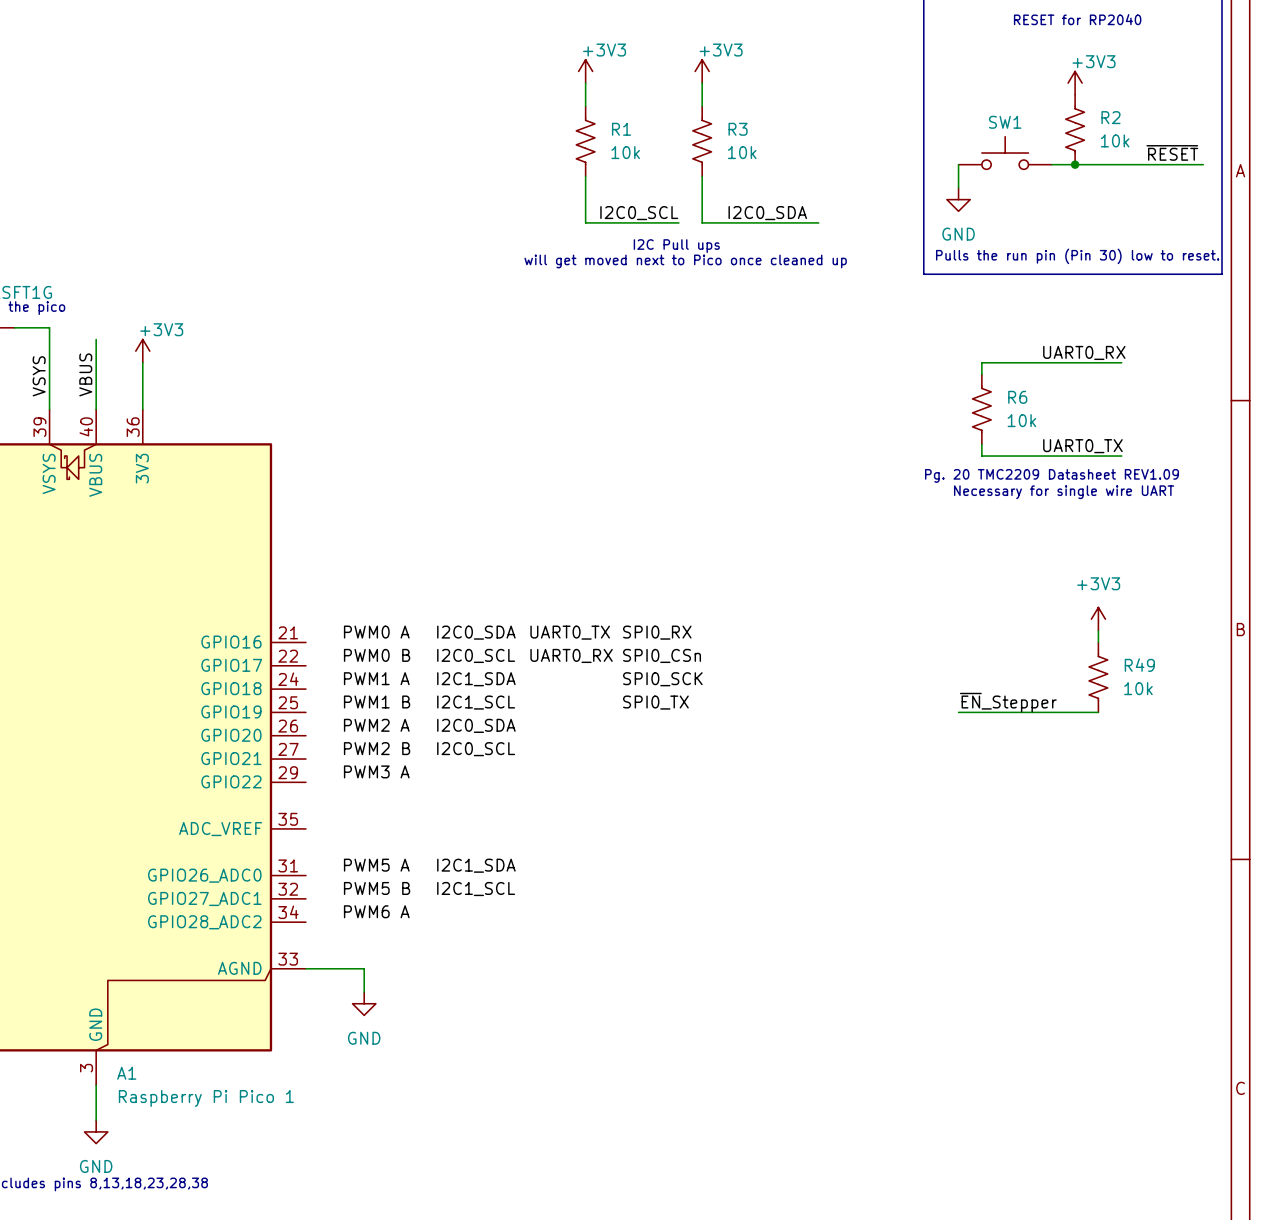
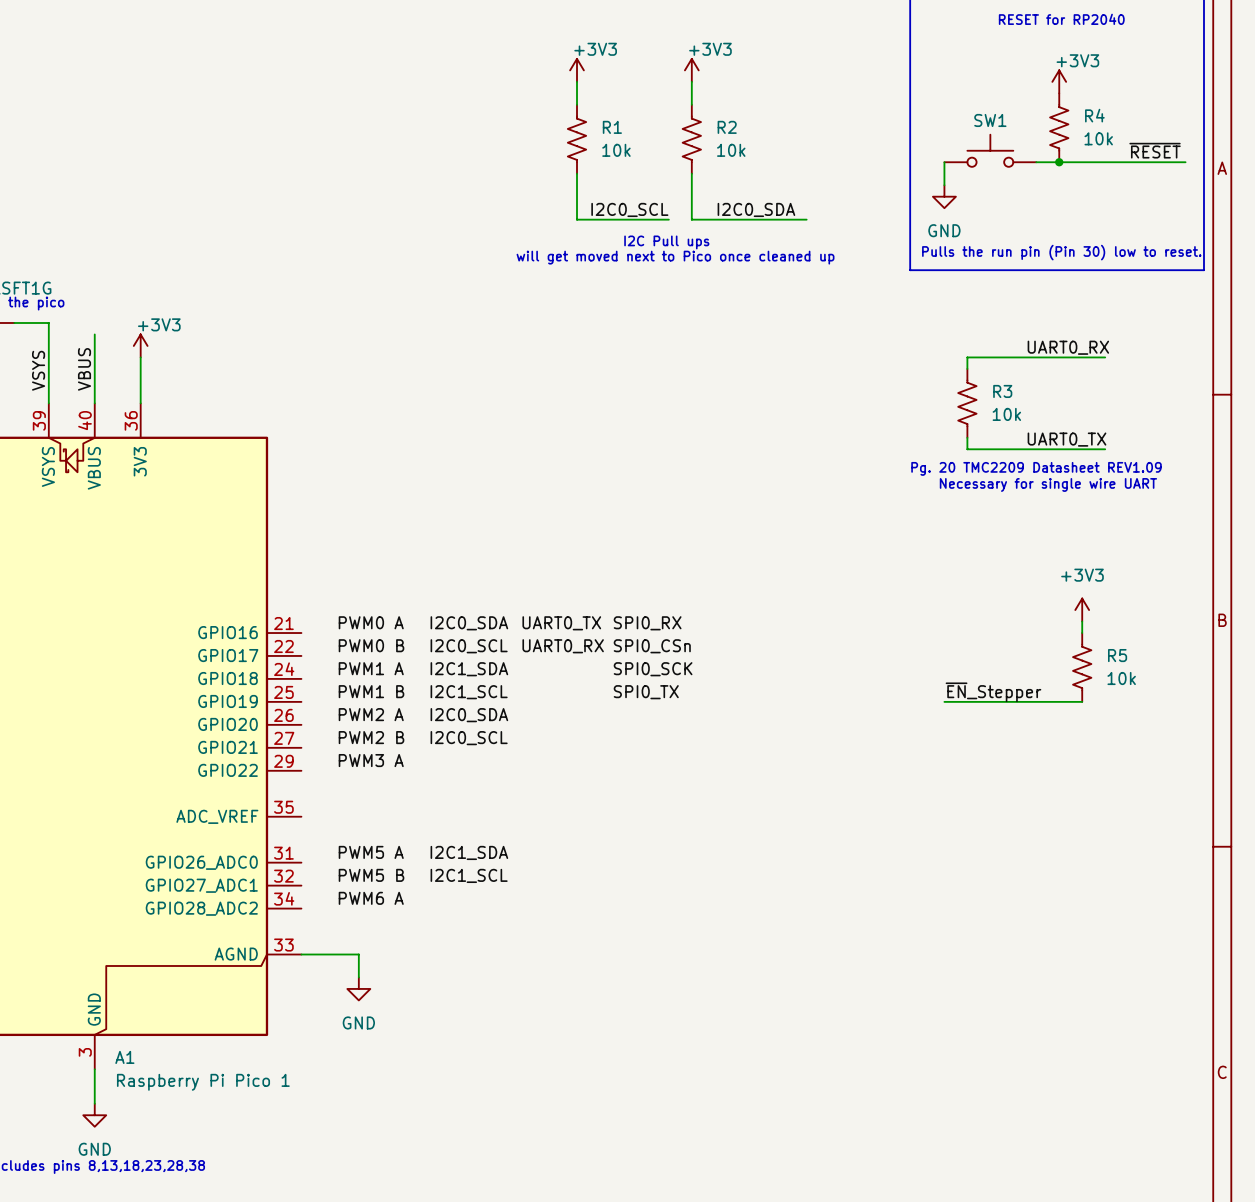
R2 name: R2 (1110, 117) -> R4 (1094, 115)
R3 name: R3 (738, 129) -> R2 (727, 127)
R6 name: R6 (1017, 397) -> R3 (1002, 391)
R49 name: R49 (1139, 665) -> R5 (1117, 655)

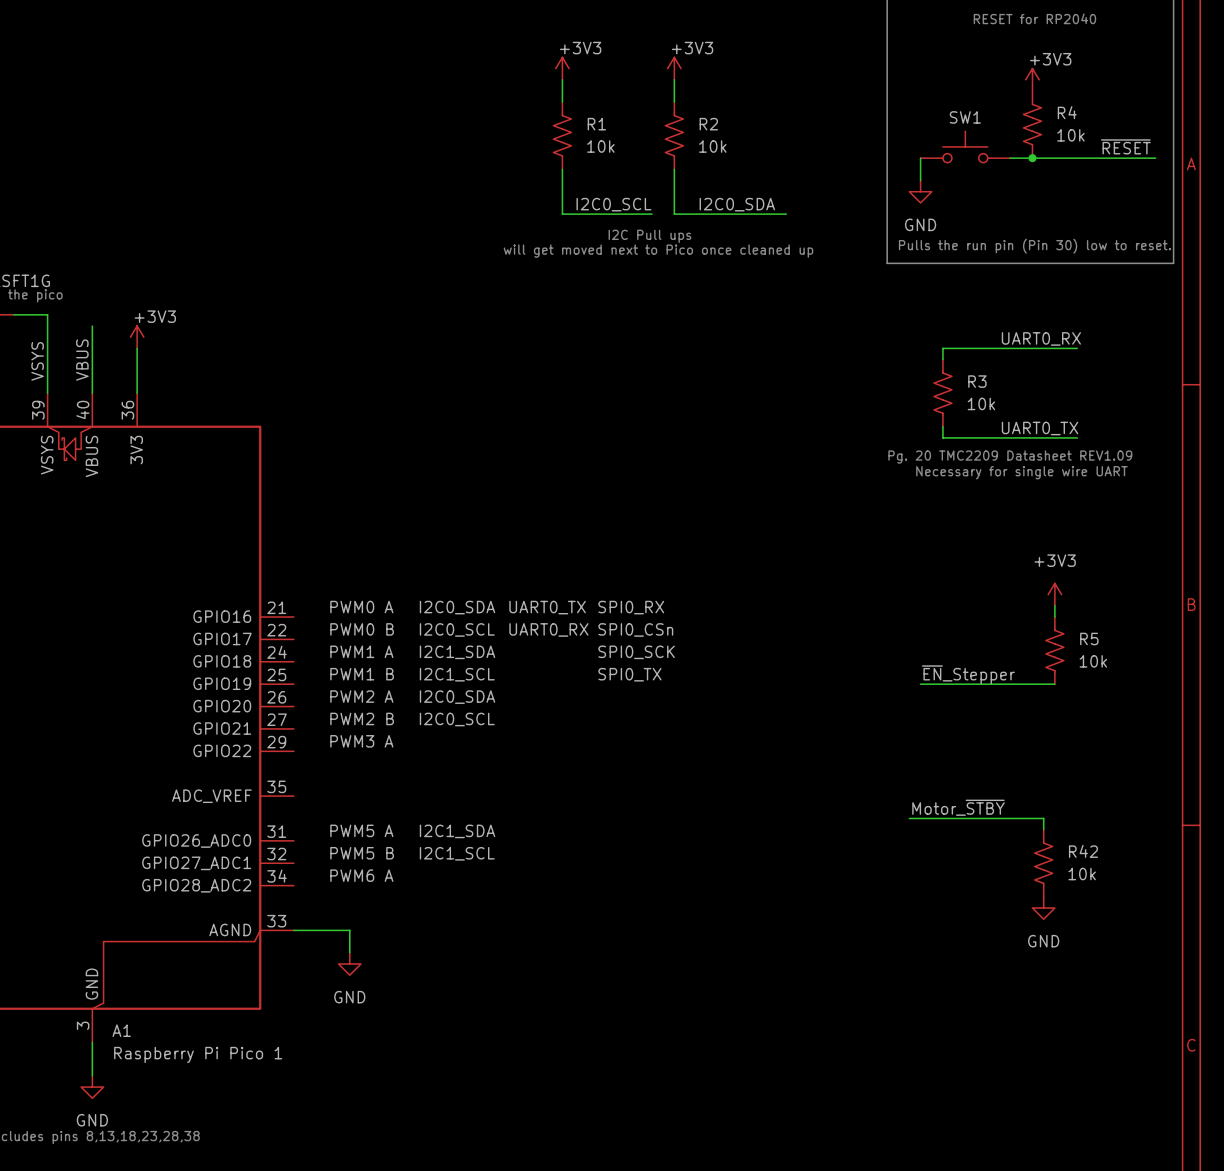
label: none -> Motor_~{STBY} (958, 807)
wire: none -> (909, 818) (1043, 818) (1043, 829)
R42: none -> 10k (1043, 863)
power symbol: none -> GND (1043, 908)

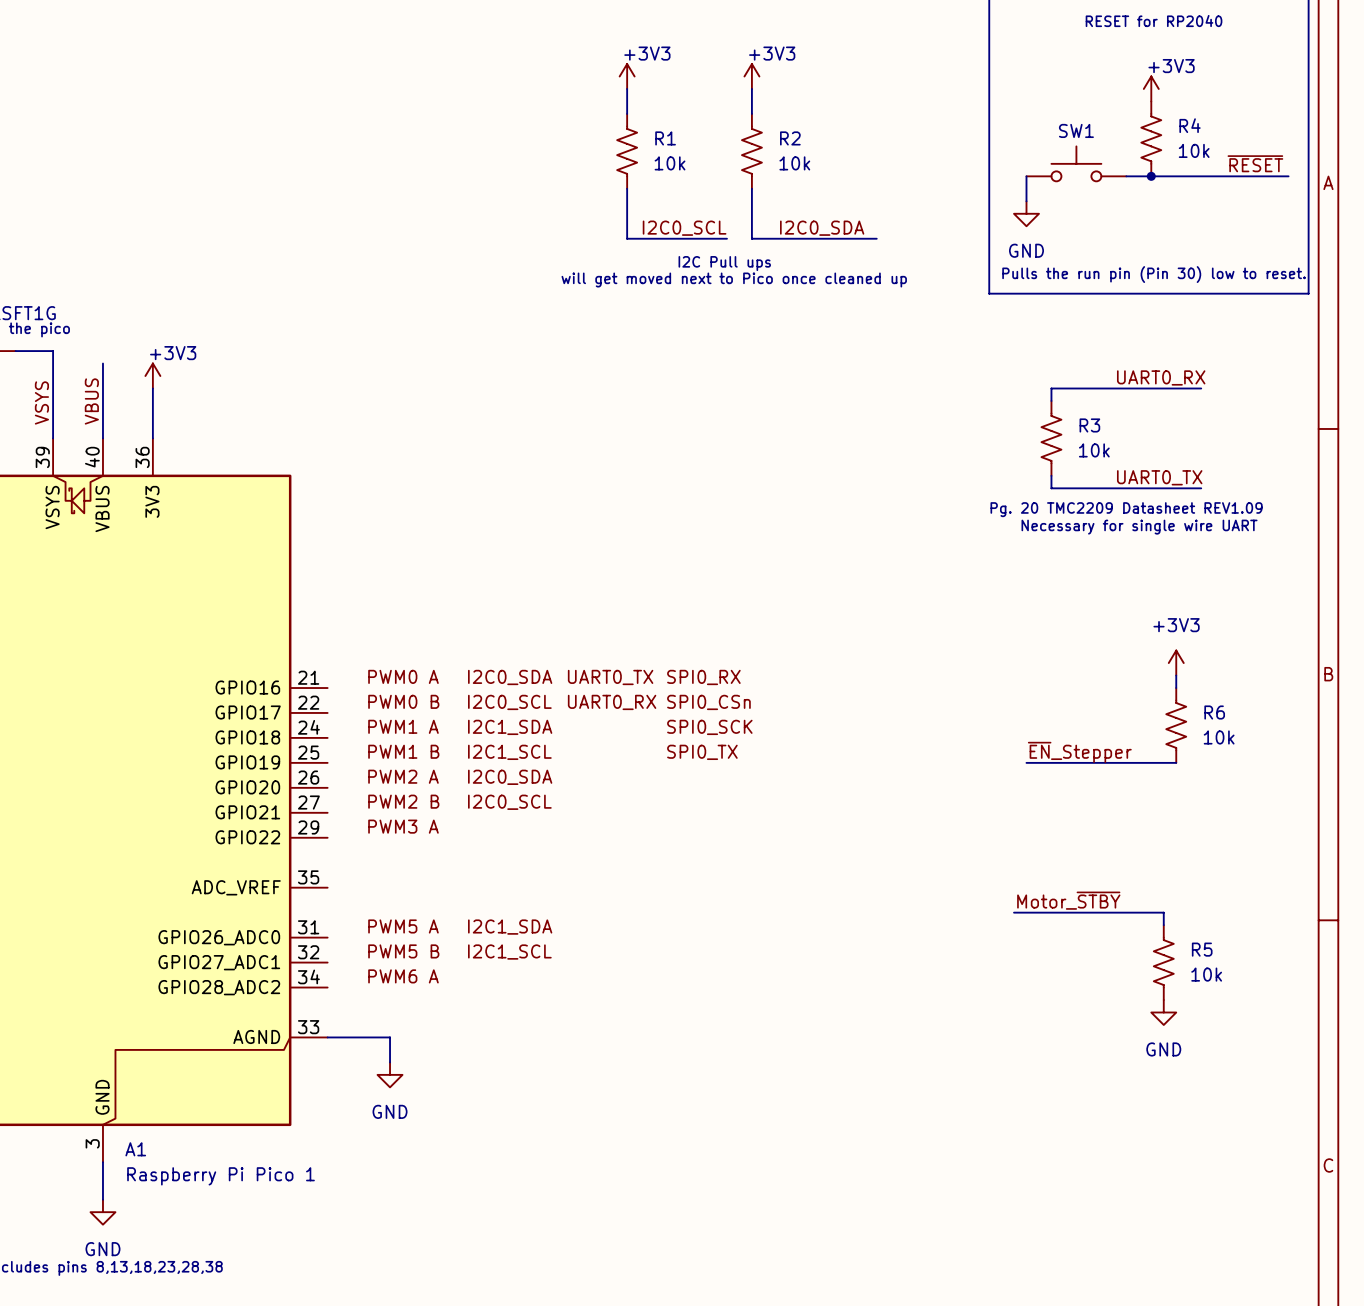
R5 name: R5 (1089, 638) -> R6 (1214, 712)
R42 name: R42 (1083, 851) -> R5 (1202, 949)

